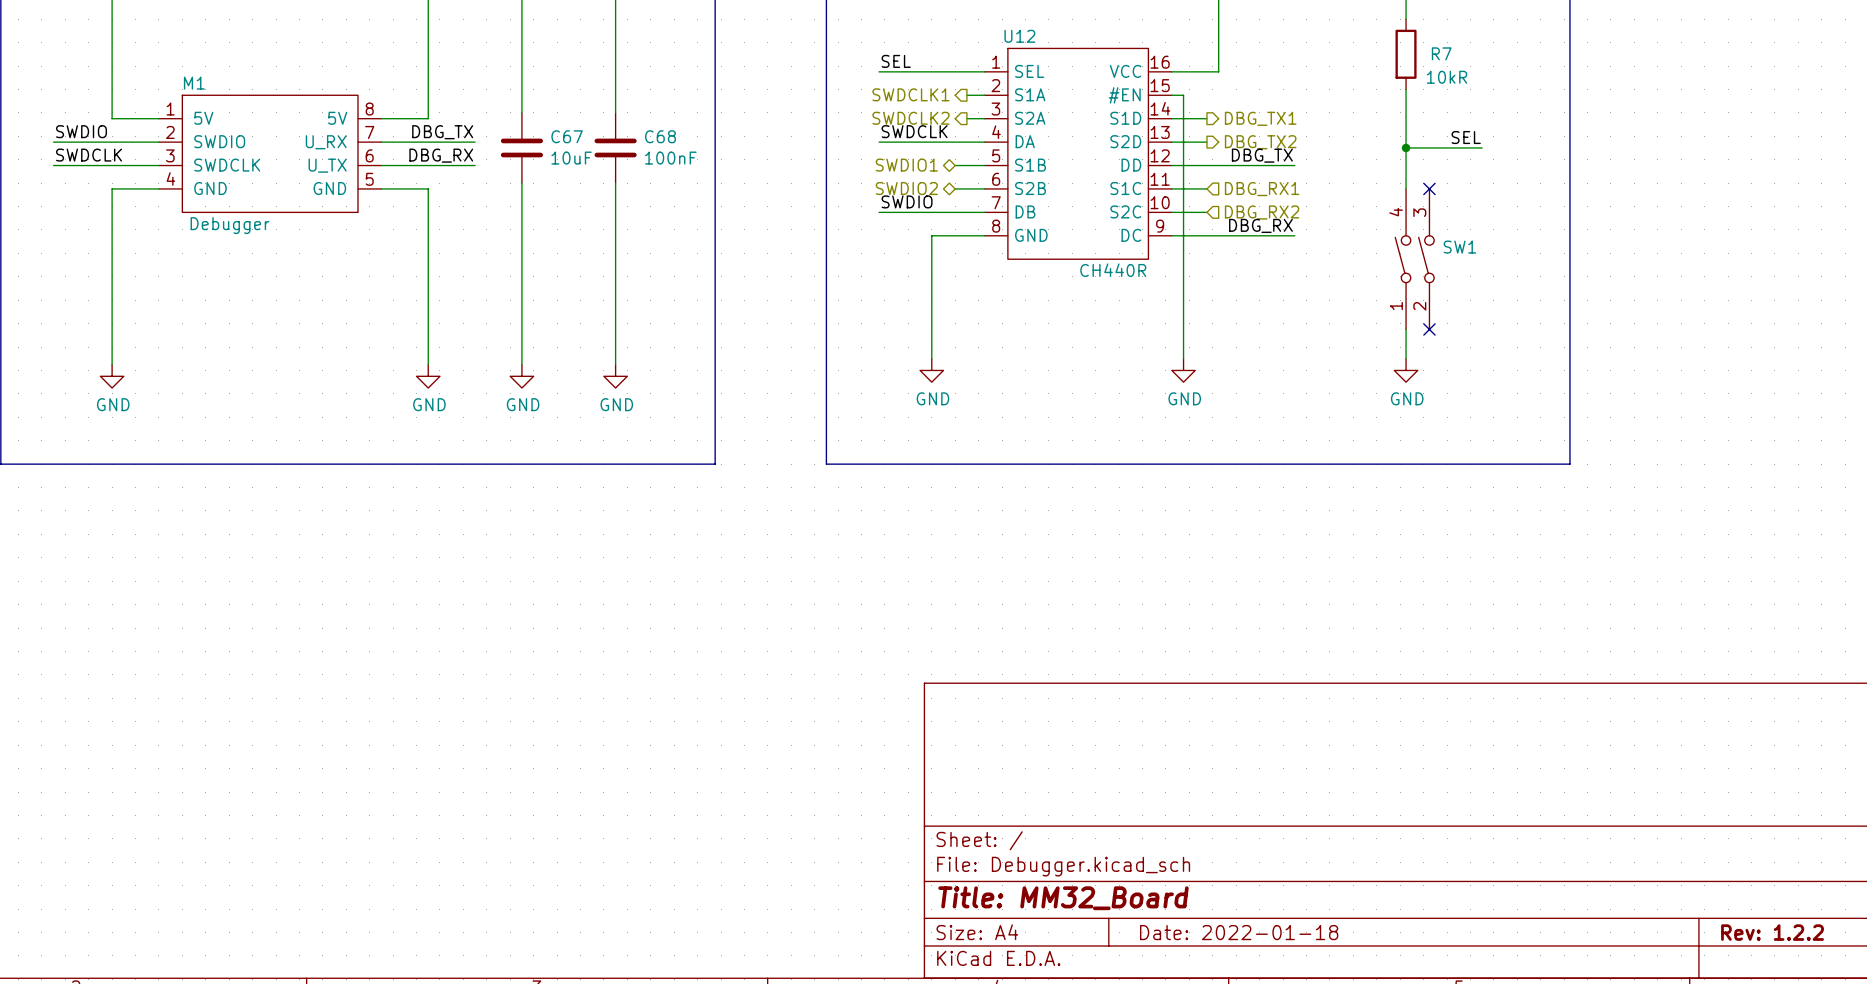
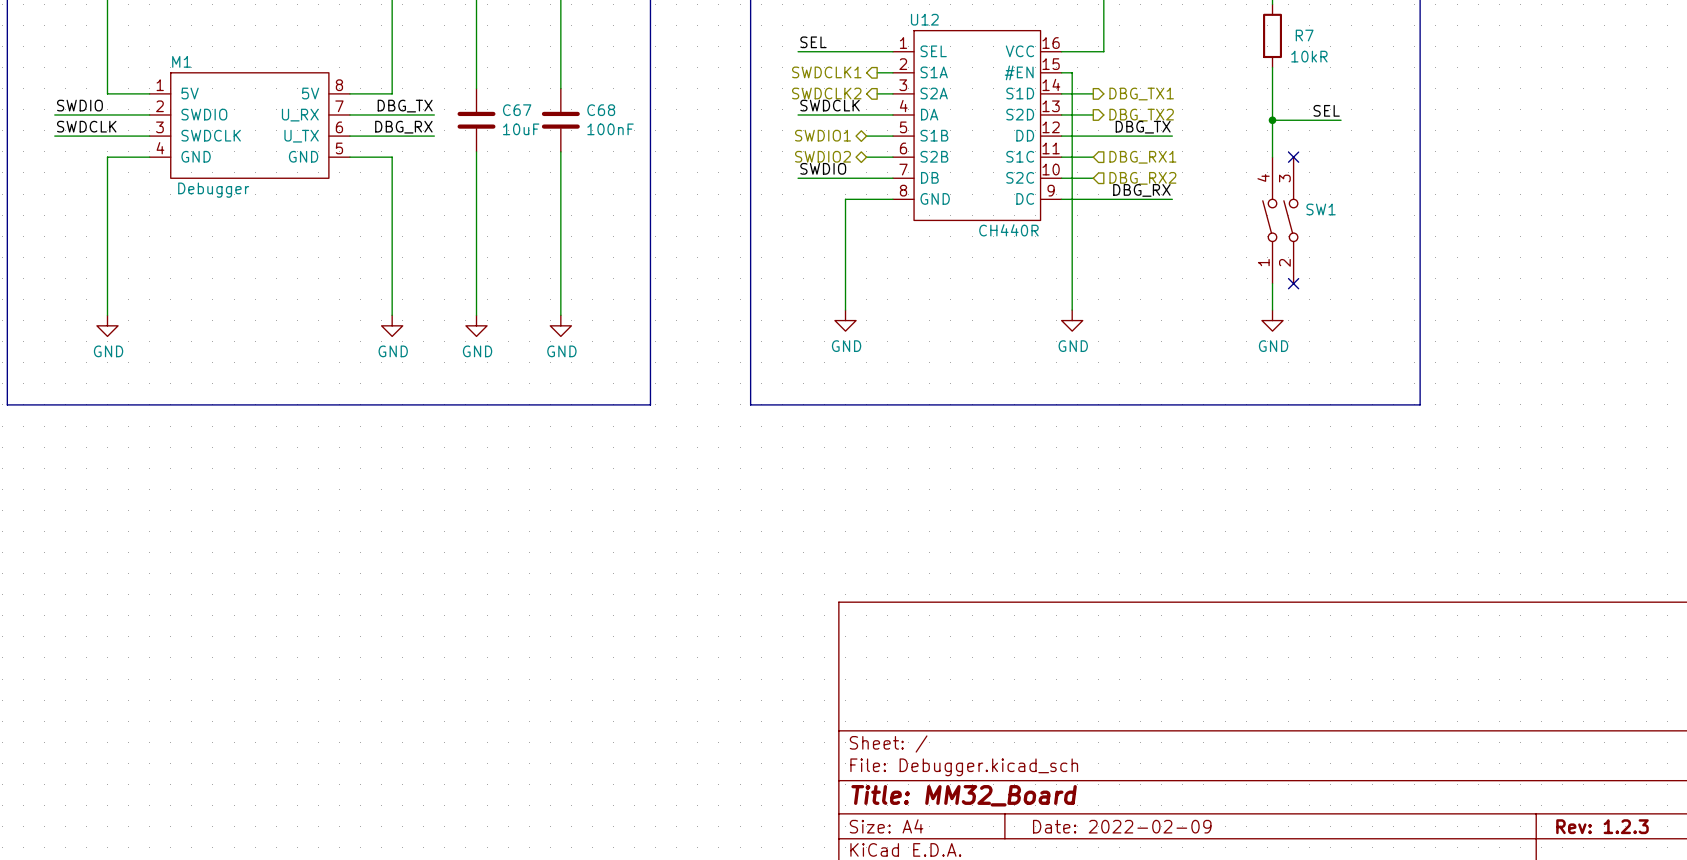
title block: Date: 2022-01-18 (1239, 932) -> Date: 2022-02-09 (1122, 826)
title block: Rev: 1.2.2 (1772, 932) -> Rev: 1.2.3 (1602, 826)

